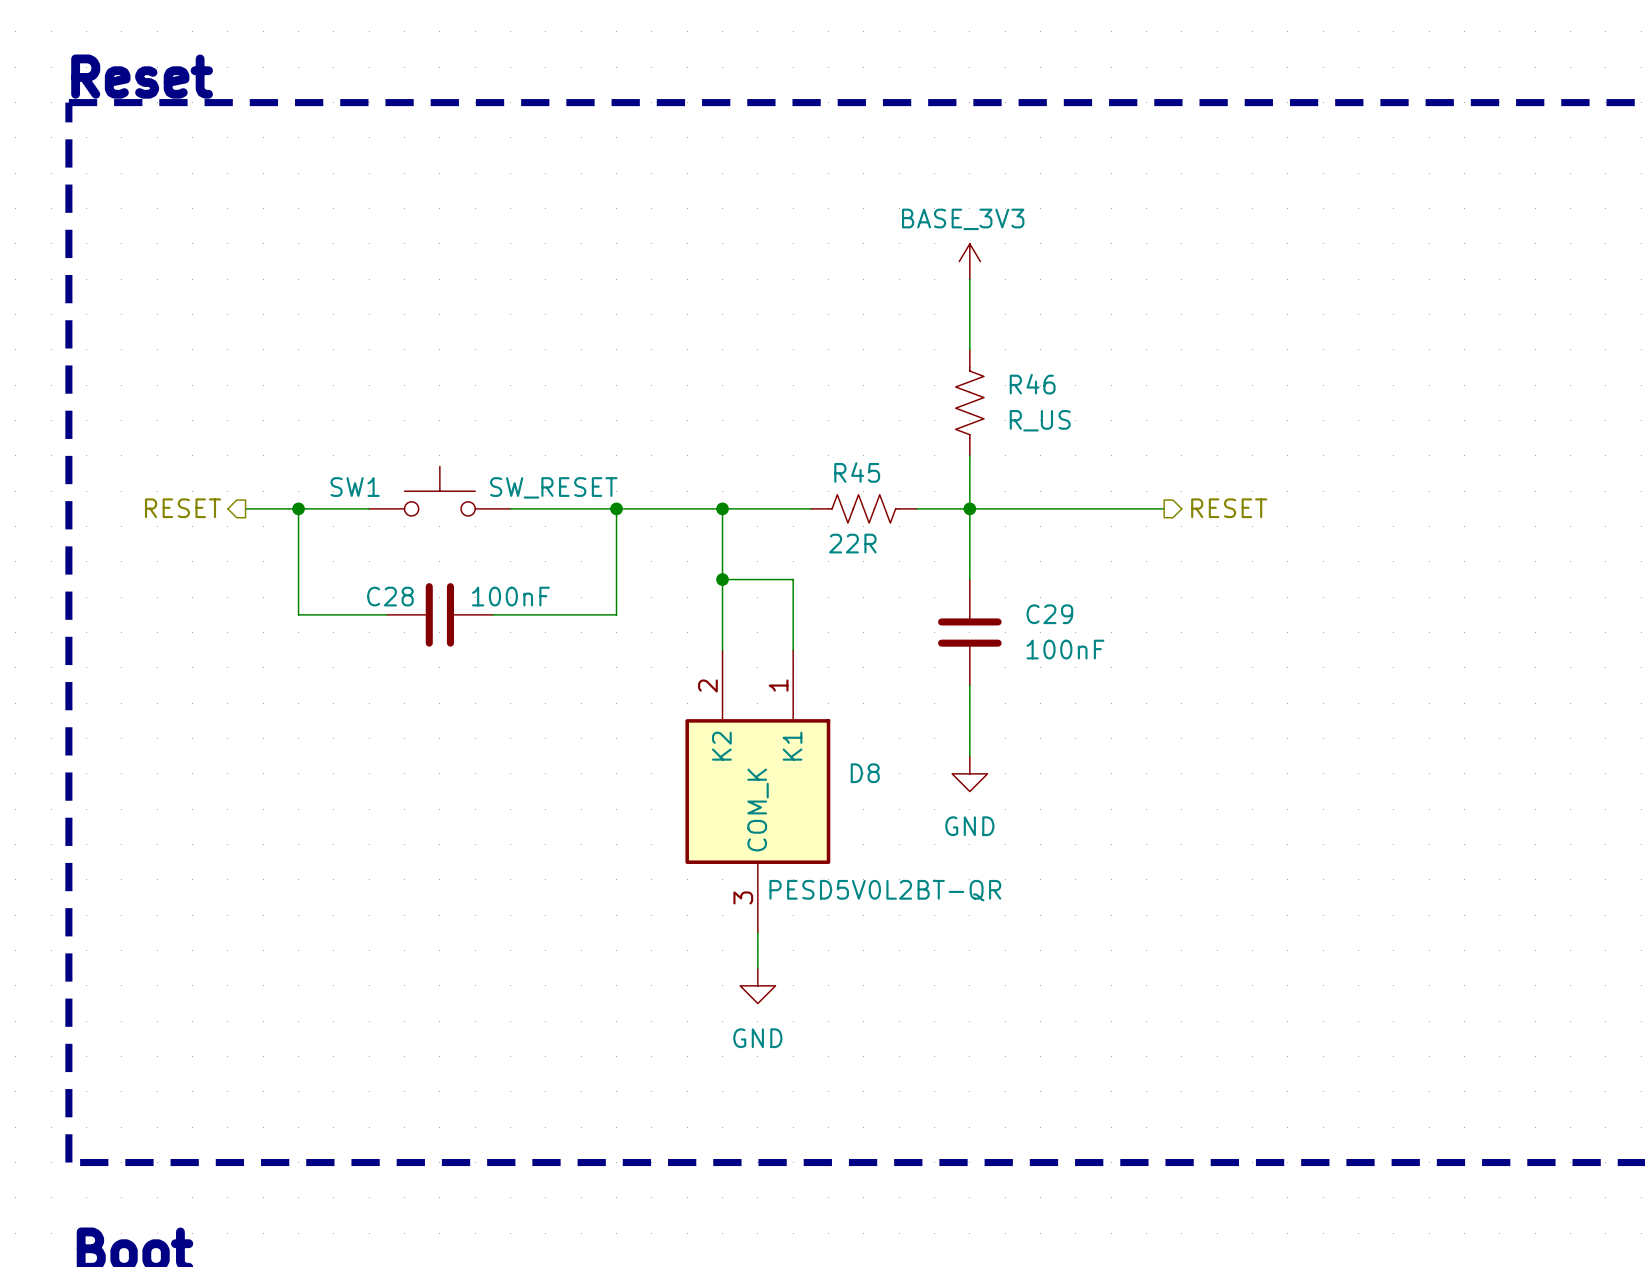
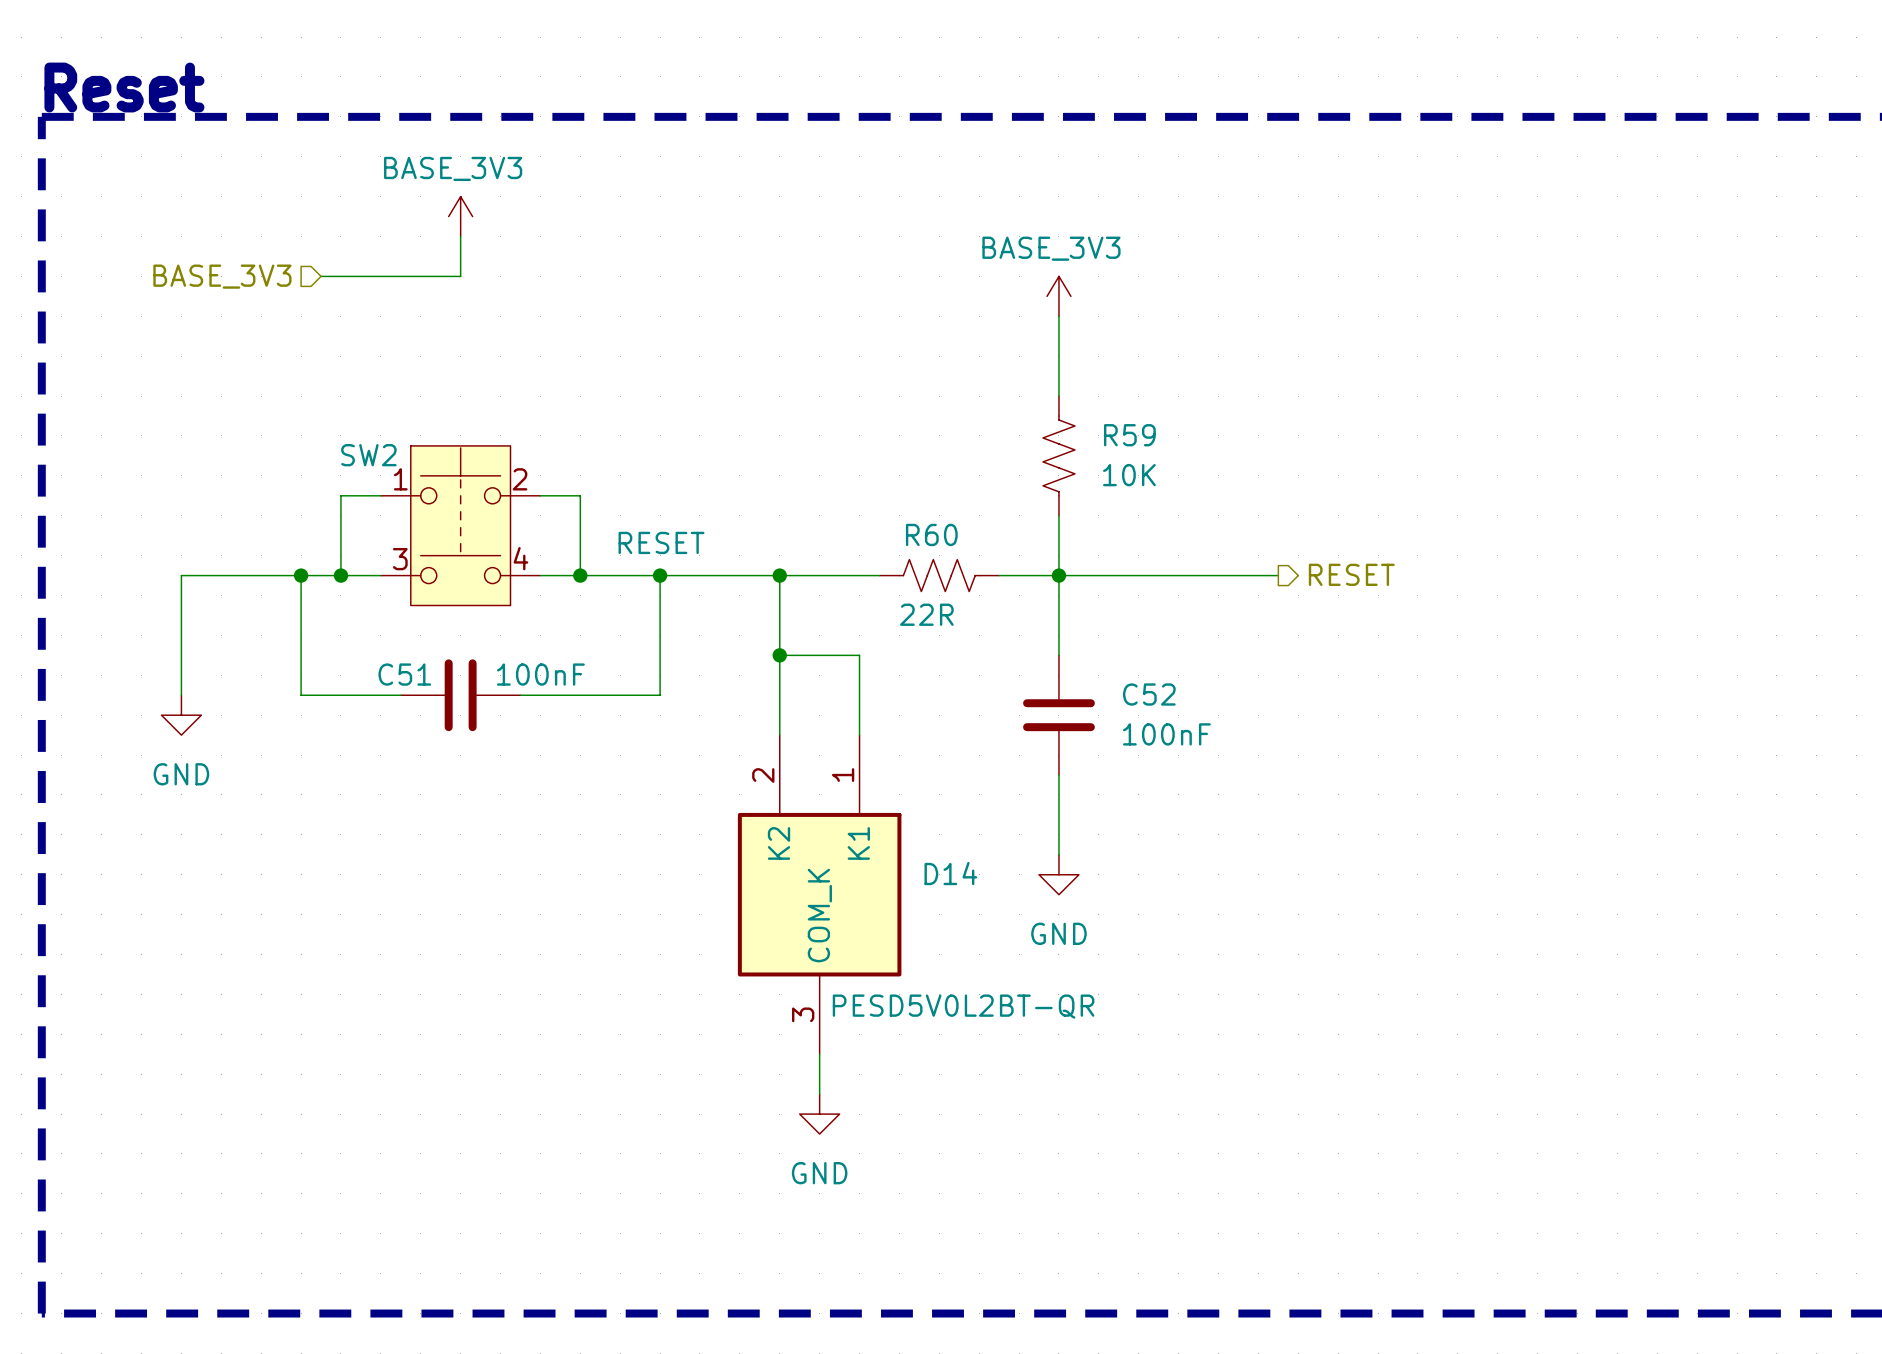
power symbol: none -> BASE_3V3 (460, 216)
wire: none -> (460, 236) (460, 276) (321, 276)
hierarchical label: none -> BASE_3V3 (222, 276)
R46 name: R46 (1032, 384) -> R59 (1129, 435)
R46 value: R_US (1040, 420) -> 10K (1129, 475)
wire: none -> (380, 495) (340, 495) (340, 575)
wire: none -> (540, 495) (580, 495) (580, 575)
SW2: none -> RESET (460, 525)
R45 name: R45 (857, 472) -> R60 (931, 534)
SW1: SW_RESET (439, 491) -> none
hierarchical label: RESET (183, 508) -> none
wire: none -> (241, 575) (181, 575) (181, 695)
junction: none -> (340, 575)
junction: none -> (580, 575)
C28 name: C28 (390, 596) -> C51 (404, 674)
C29 name: C29 (1049, 614) -> C52 (1149, 694)
power symbol: none -> GND (181, 715)
D8 name: D8 (865, 773) -> D14 (950, 873)

